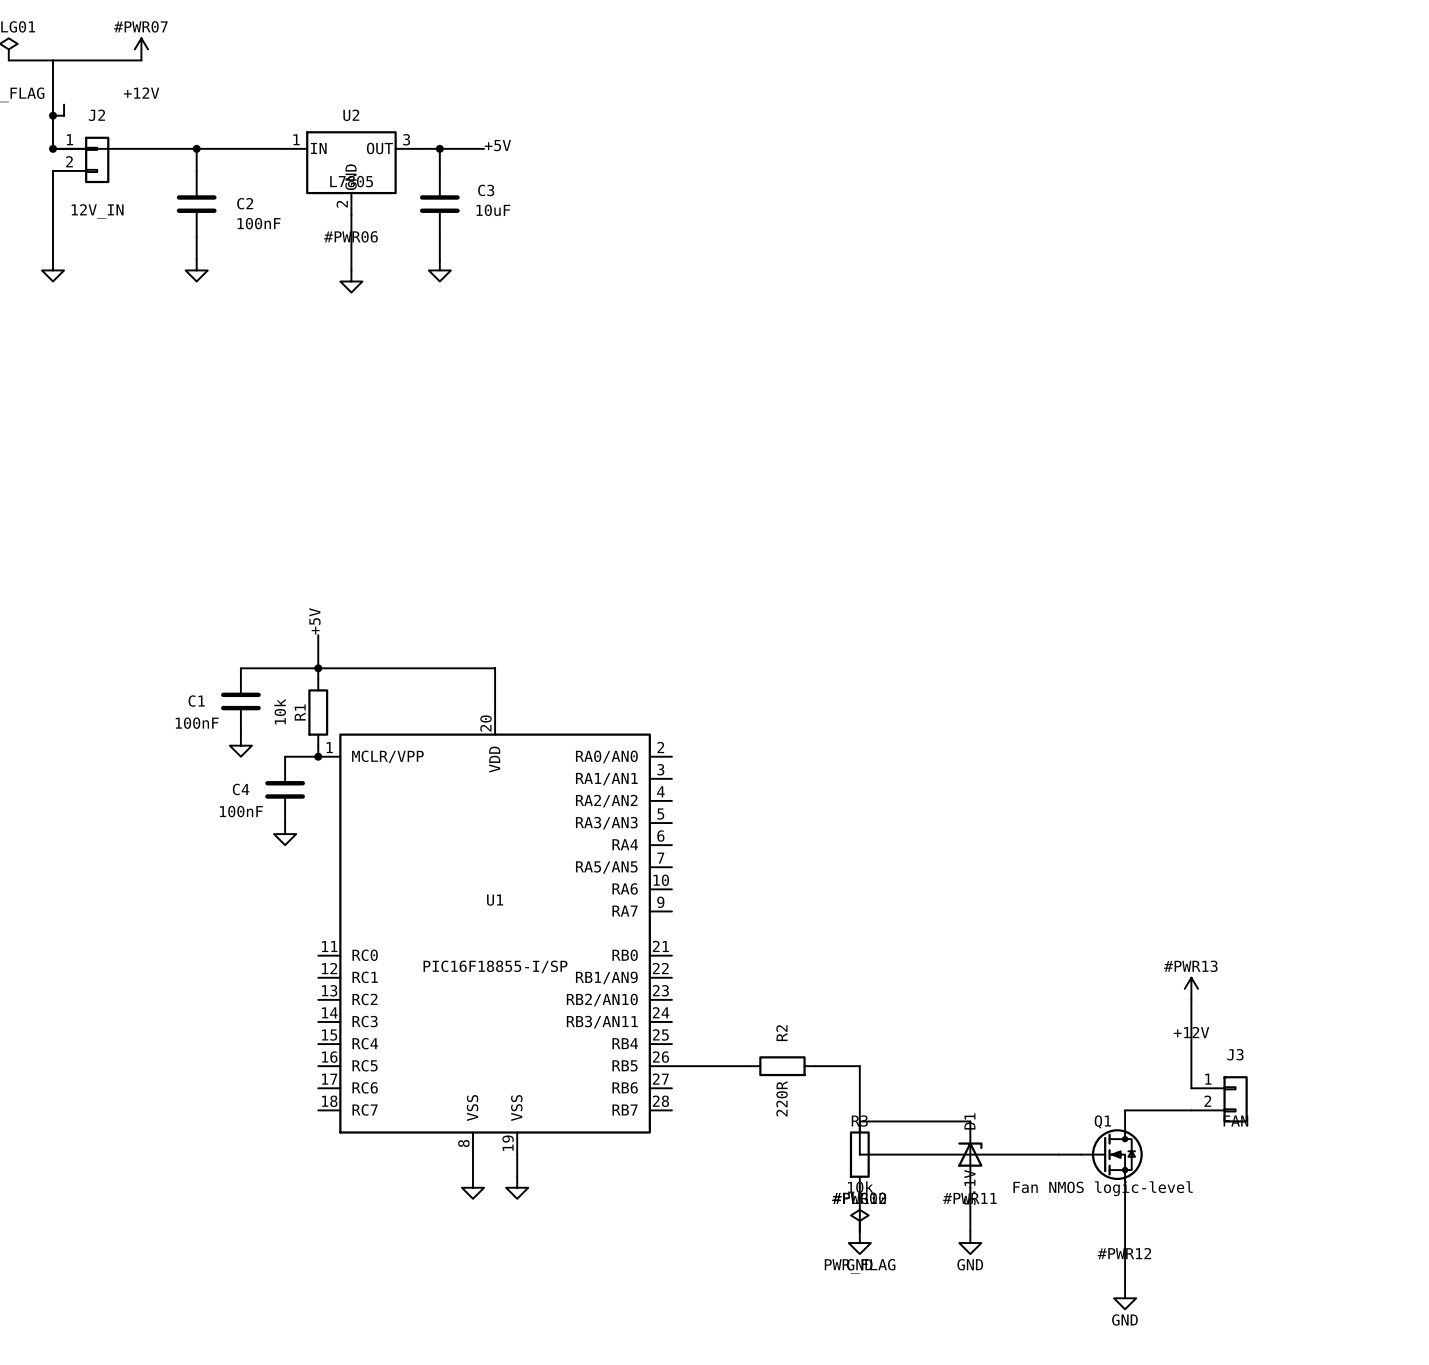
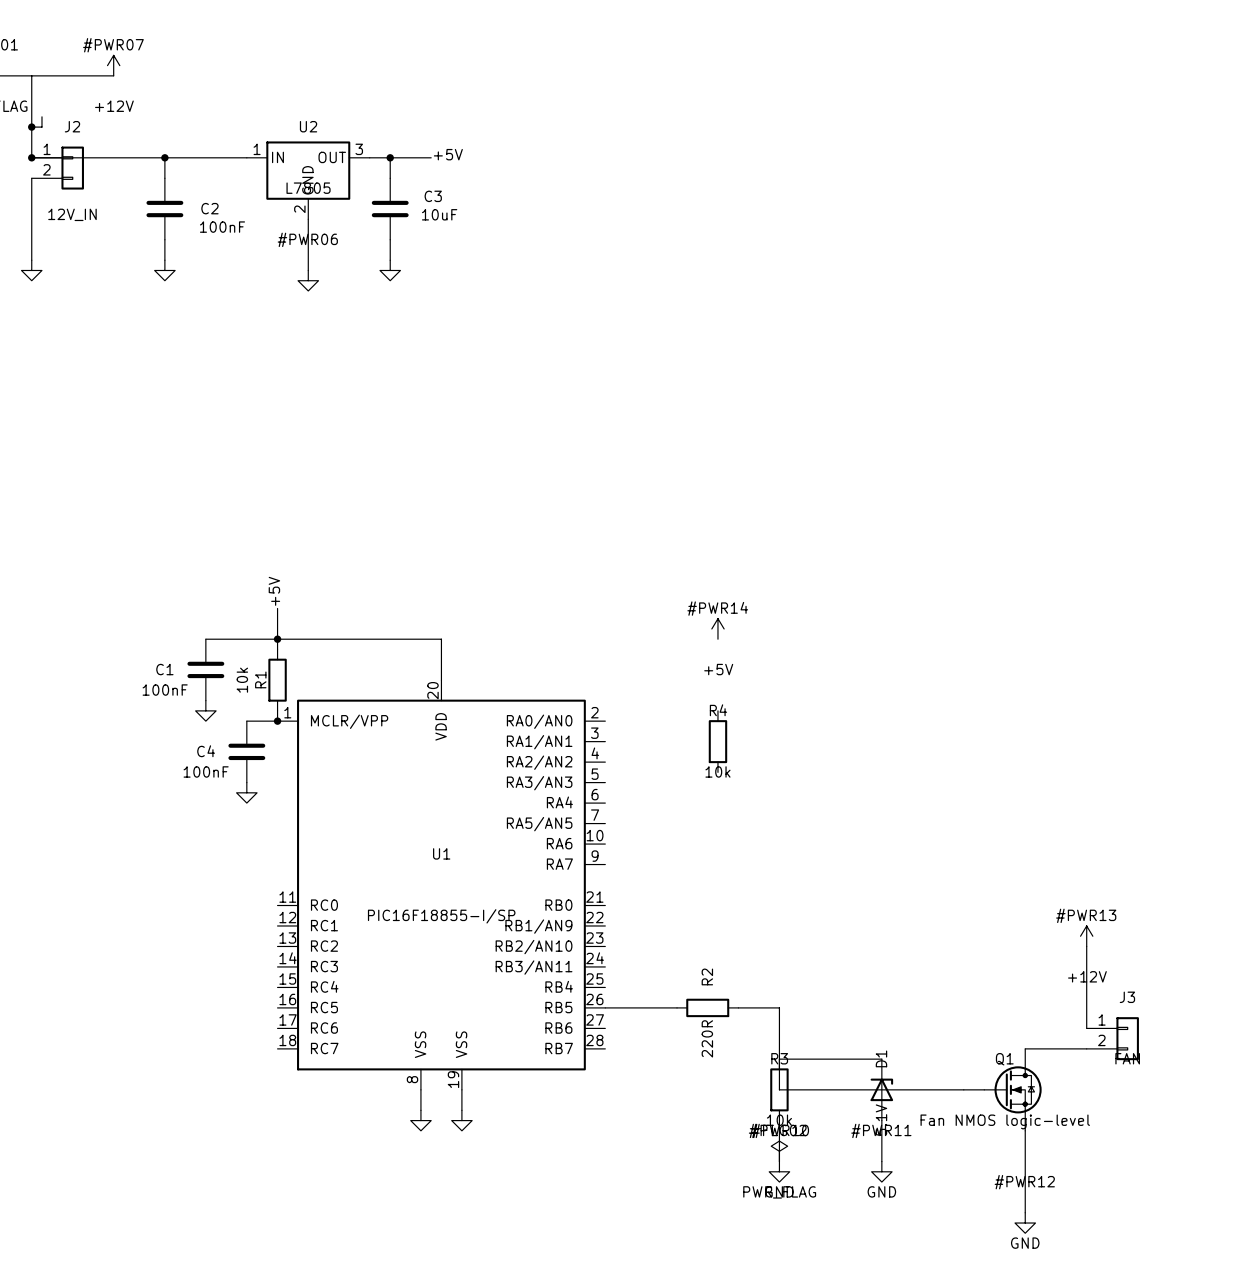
#PWR14: none -> +5V (717, 628)
R4: none -> 10k (717, 741)

